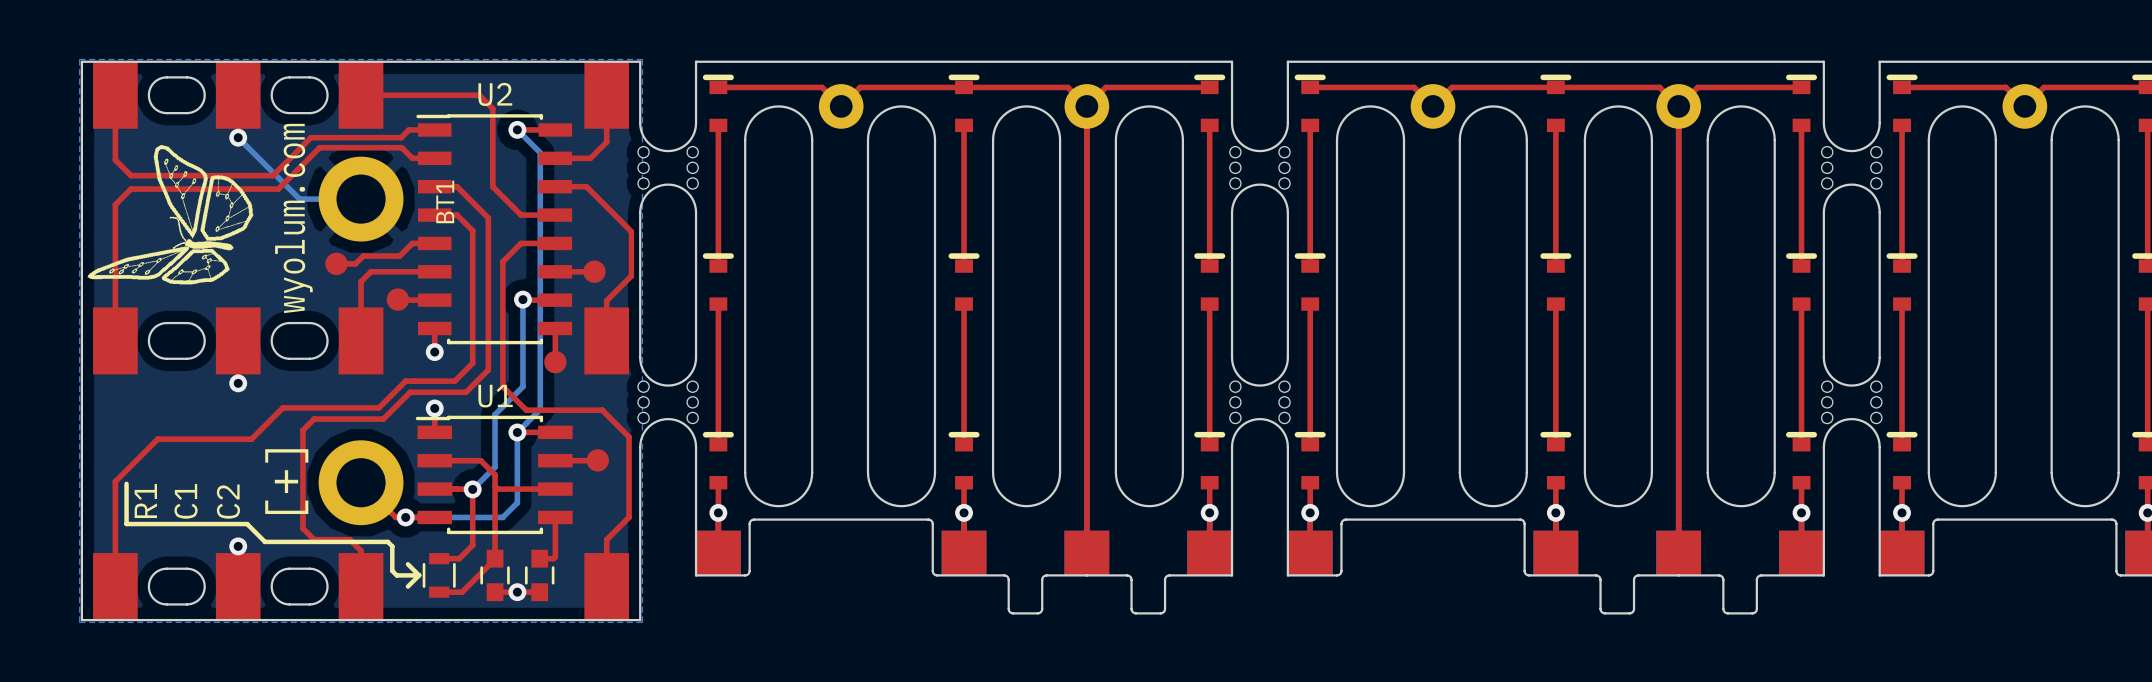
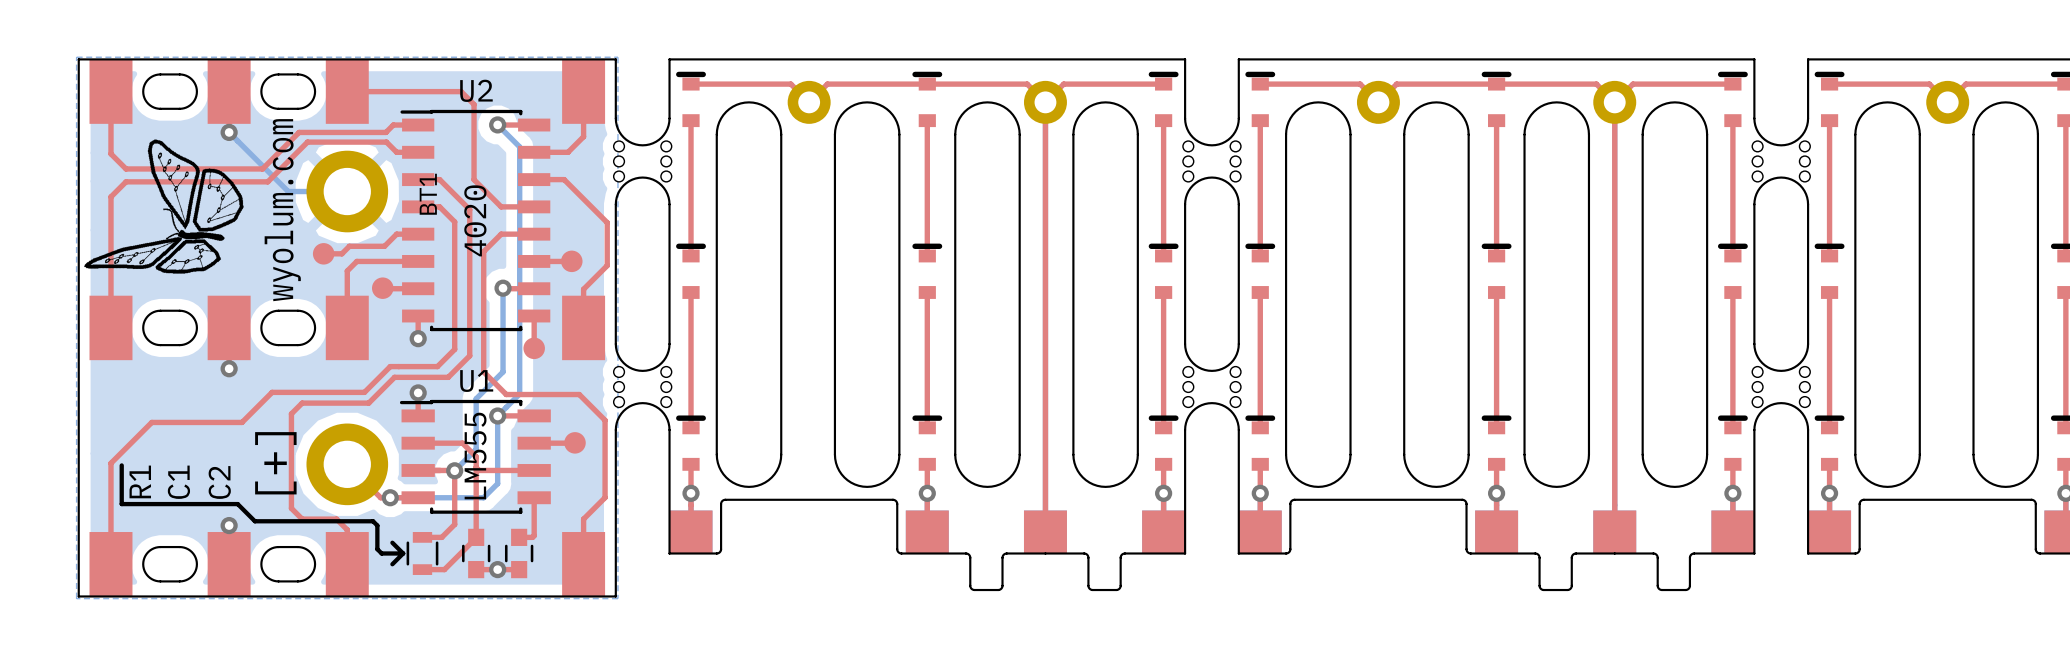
U2 value: none -> 4020 (475, 220)
U1 value: none -> LM555 (475, 456)

